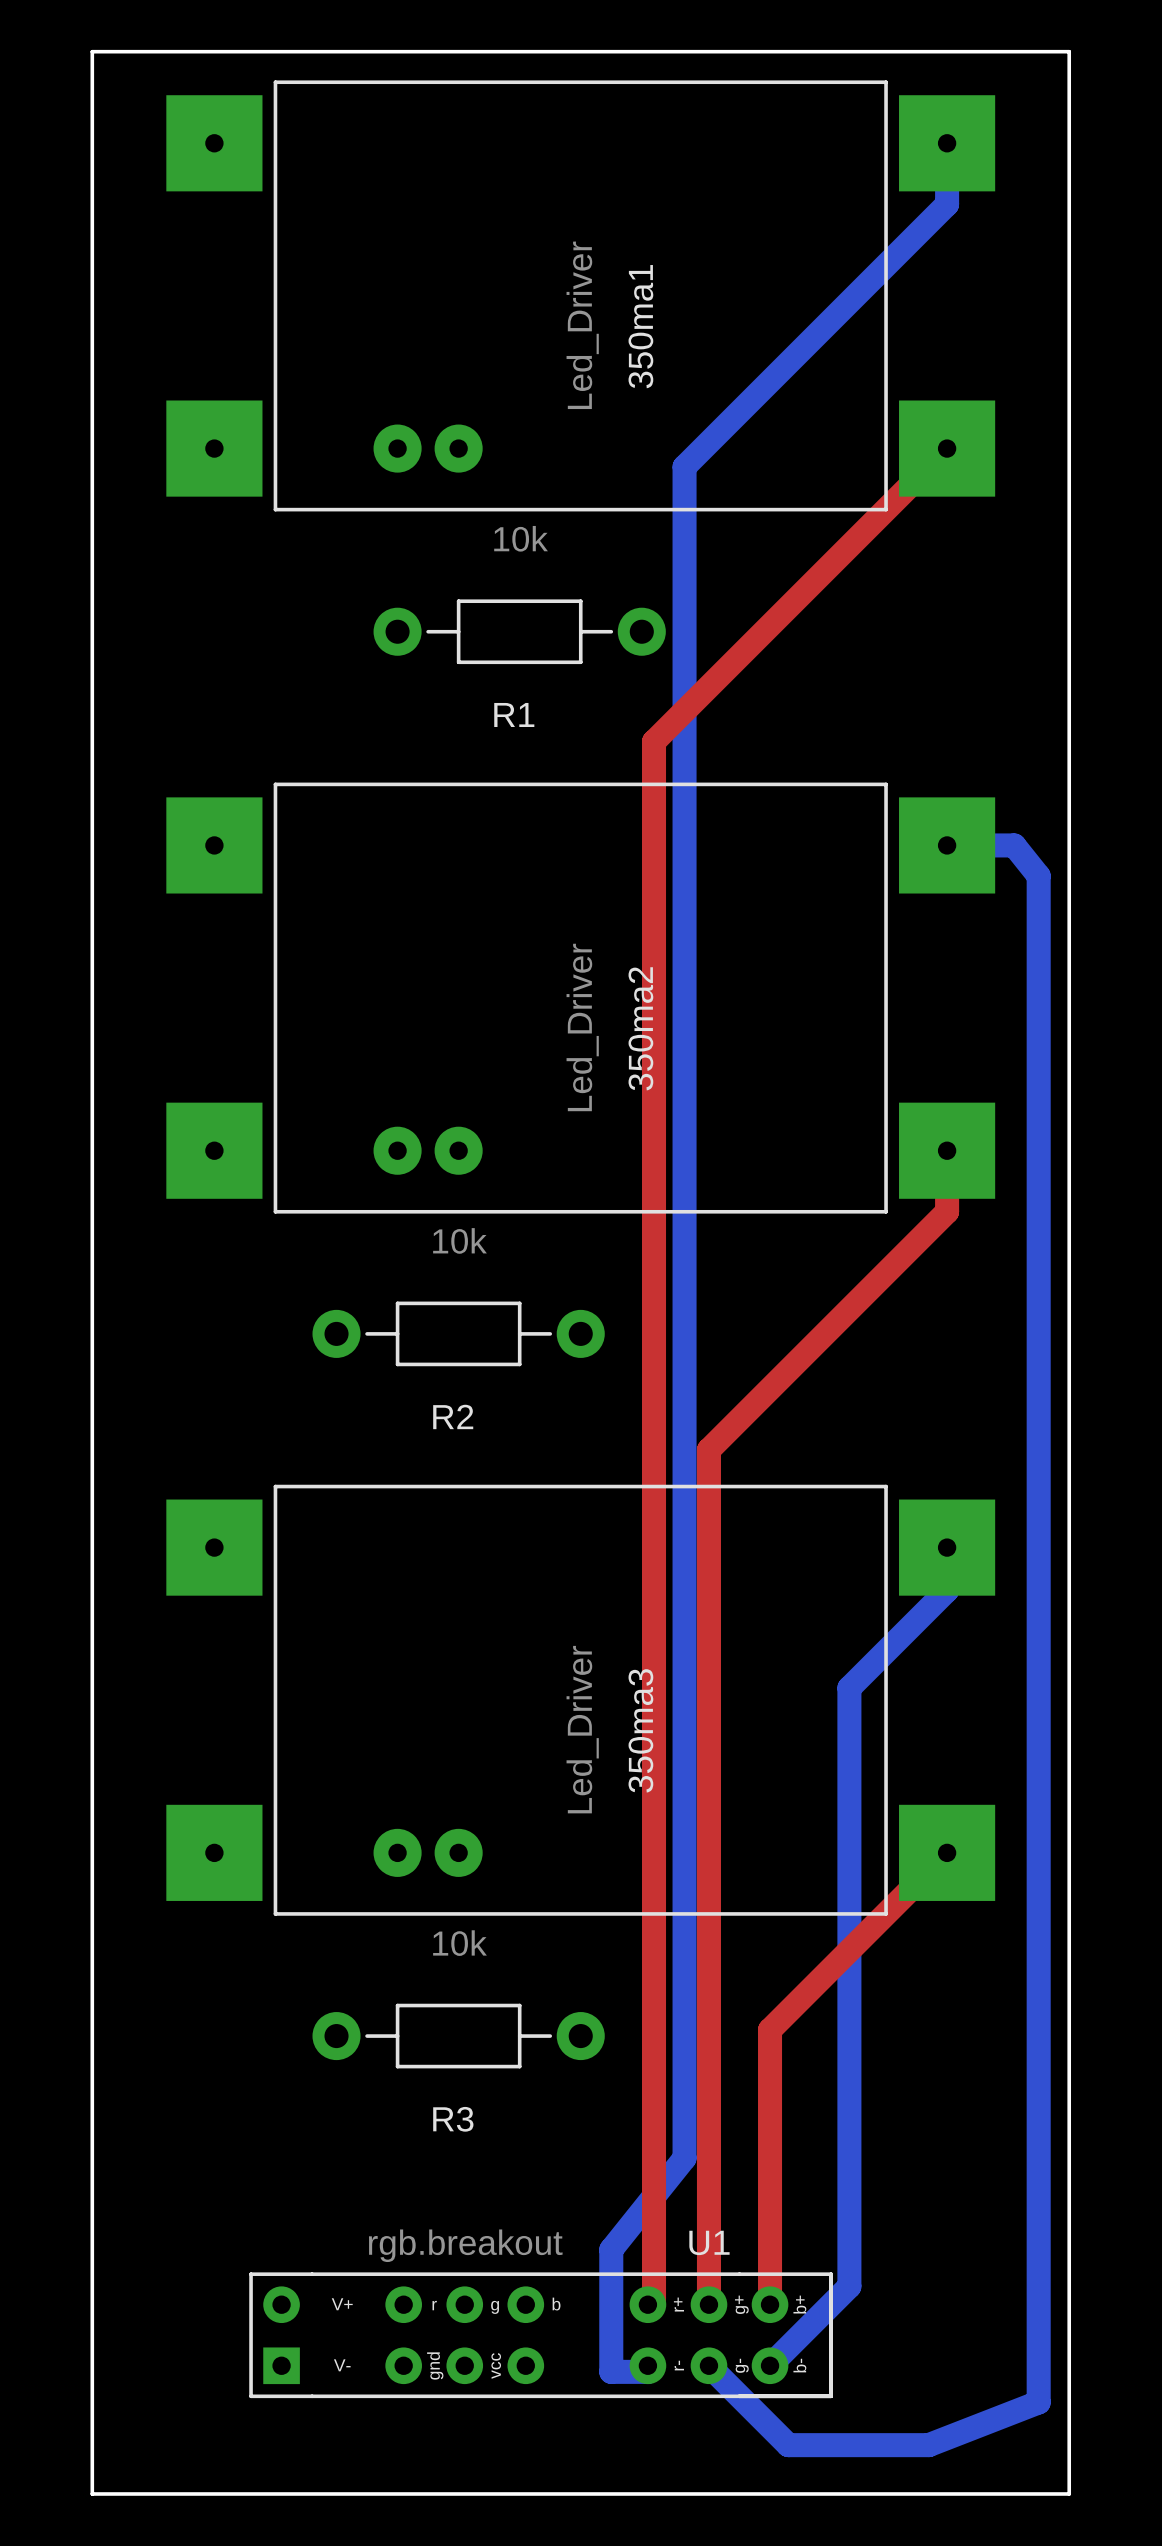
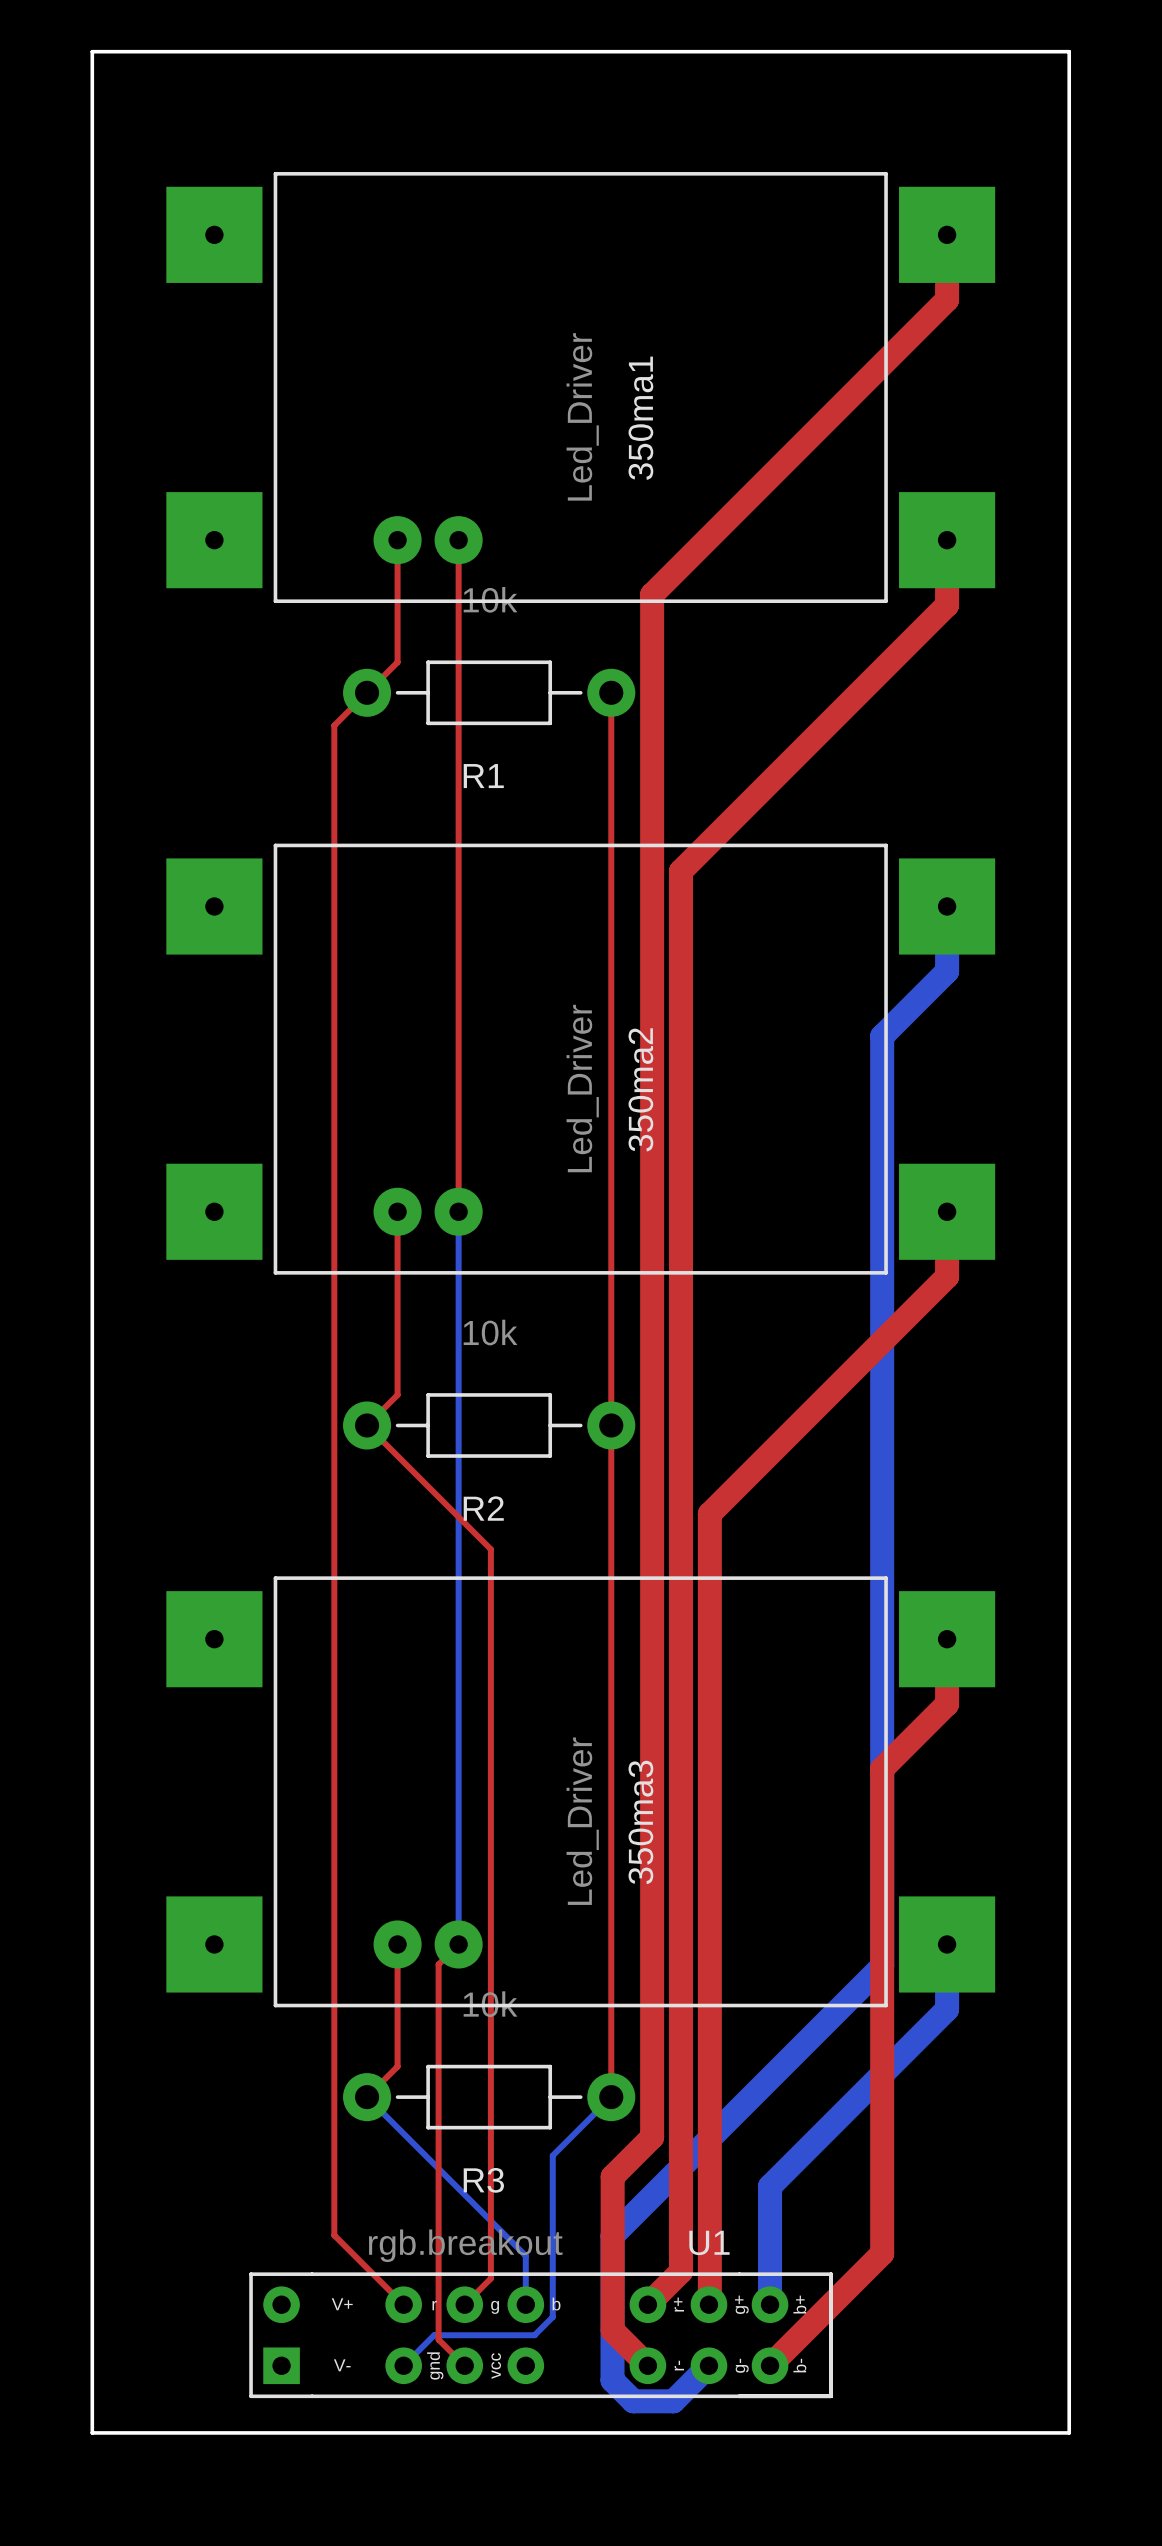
bottom track: (947, 143) (947, 204) (684, 466) (684, 2158) (611, 2249) (611, 2371) (647, 2371) (647, 2365) -> none
top track: none -> (947, 234) (947, 299) (652, 594) (652, 2137) (612, 2176) (612, 2330) (647, 2365)
350ma1 position: (580, 295) -> (580, 387)
top track: (947, 448) (654, 741) (654, 2298) -> (947, 540) (947, 605) (680, 871) (680, 2271) (654, 2298)
top track: none -> (397, 540) (397, 662) (334, 725) (334, 2235) (403, 2304)
top track: none -> (458, 540) (458, 1211)
R1 position: (519, 631) -> (489, 692)
top track: none -> (611, 692) (611, 2097)
bottom track: (947, 845) (1014, 845) (1038, 875) (1038, 2402) (928, 2445) (788, 2445) (708, 2365) -> (947, 906) (947, 971) (882, 1036) (882, 1966) (612, 2235) (612, 2380) (633, 2401) (673, 2401) (708, 2365)
350ma2 position: (580, 998) -> (580, 1059)
top track: (947, 1150) (947, 1211) (708, 1449) (708, 2304) -> (947, 1211) (947, 1276) (709, 1513) (708, 2304)
top track: none -> (397, 1211) (397, 1394) (367, 1425) (490, 1549) (490, 2278) (464, 2304)
bottom track: none -> (458, 1211) (458, 1944)
R2 position: (458, 1333) -> (489, 1425)
bottom track: (947, 1547) (947, 1590) (849, 1688) (849, 2286) (770, 2365) -> none
top track: none -> (947, 1639) (947, 1704) (882, 1769) (882, 2253) (770, 2365)
350ma3 position: (580, 1700) -> (580, 1791)
top track: (947, 1852) (770, 2029) (770, 2304) -> none
top track: none -> (397, 1944) (397, 2066) (367, 2097)
top track: none -> (458, 1944) (438, 1964) (438, 2339) (464, 2365)
bottom track: none -> (947, 1944) (947, 2009) (770, 2186) (770, 2304)
R3 position: (458, 2036) -> (489, 2097)
bottom track: none -> (367, 2097) (525, 2255) (525, 2304)
bottom track: none -> (611, 2097) (552, 2155) (552, 2317) (534, 2335) (434, 2335) (403, 2365)
board edge: (92, 2432) (92, 2493) (1069, 2493) (1069, 2432) -> (92, 2432) (1069, 2432)

